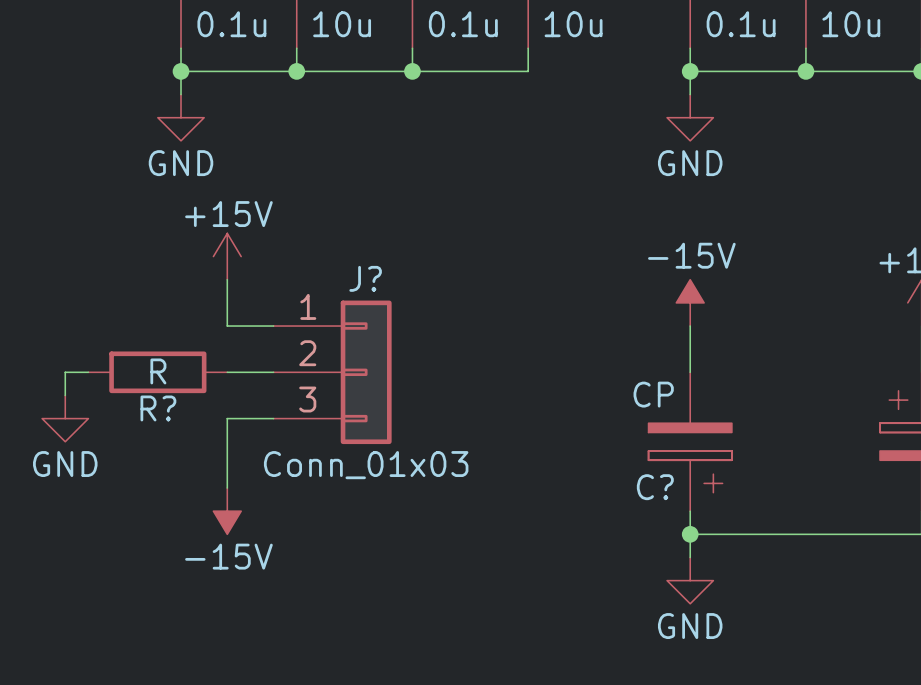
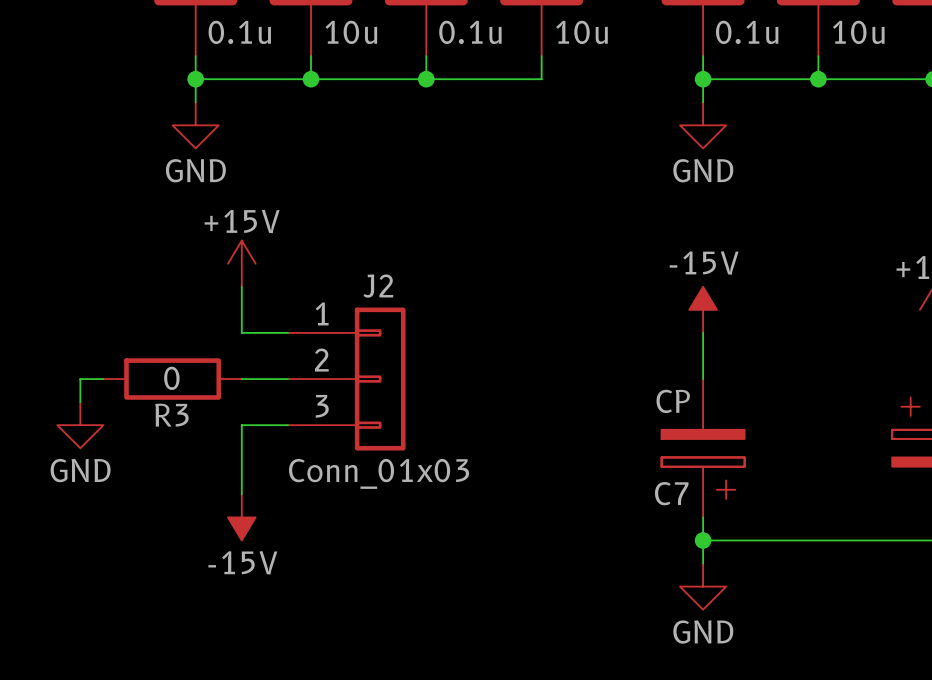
J? name: J? (365, 278) -> J2 (378, 286)
R? value: R (158, 371) -> 0 (171, 378)
R? name: R? (158, 408) -> R3 (171, 415)
C? name: C? (655, 487) -> C7 (671, 493)

